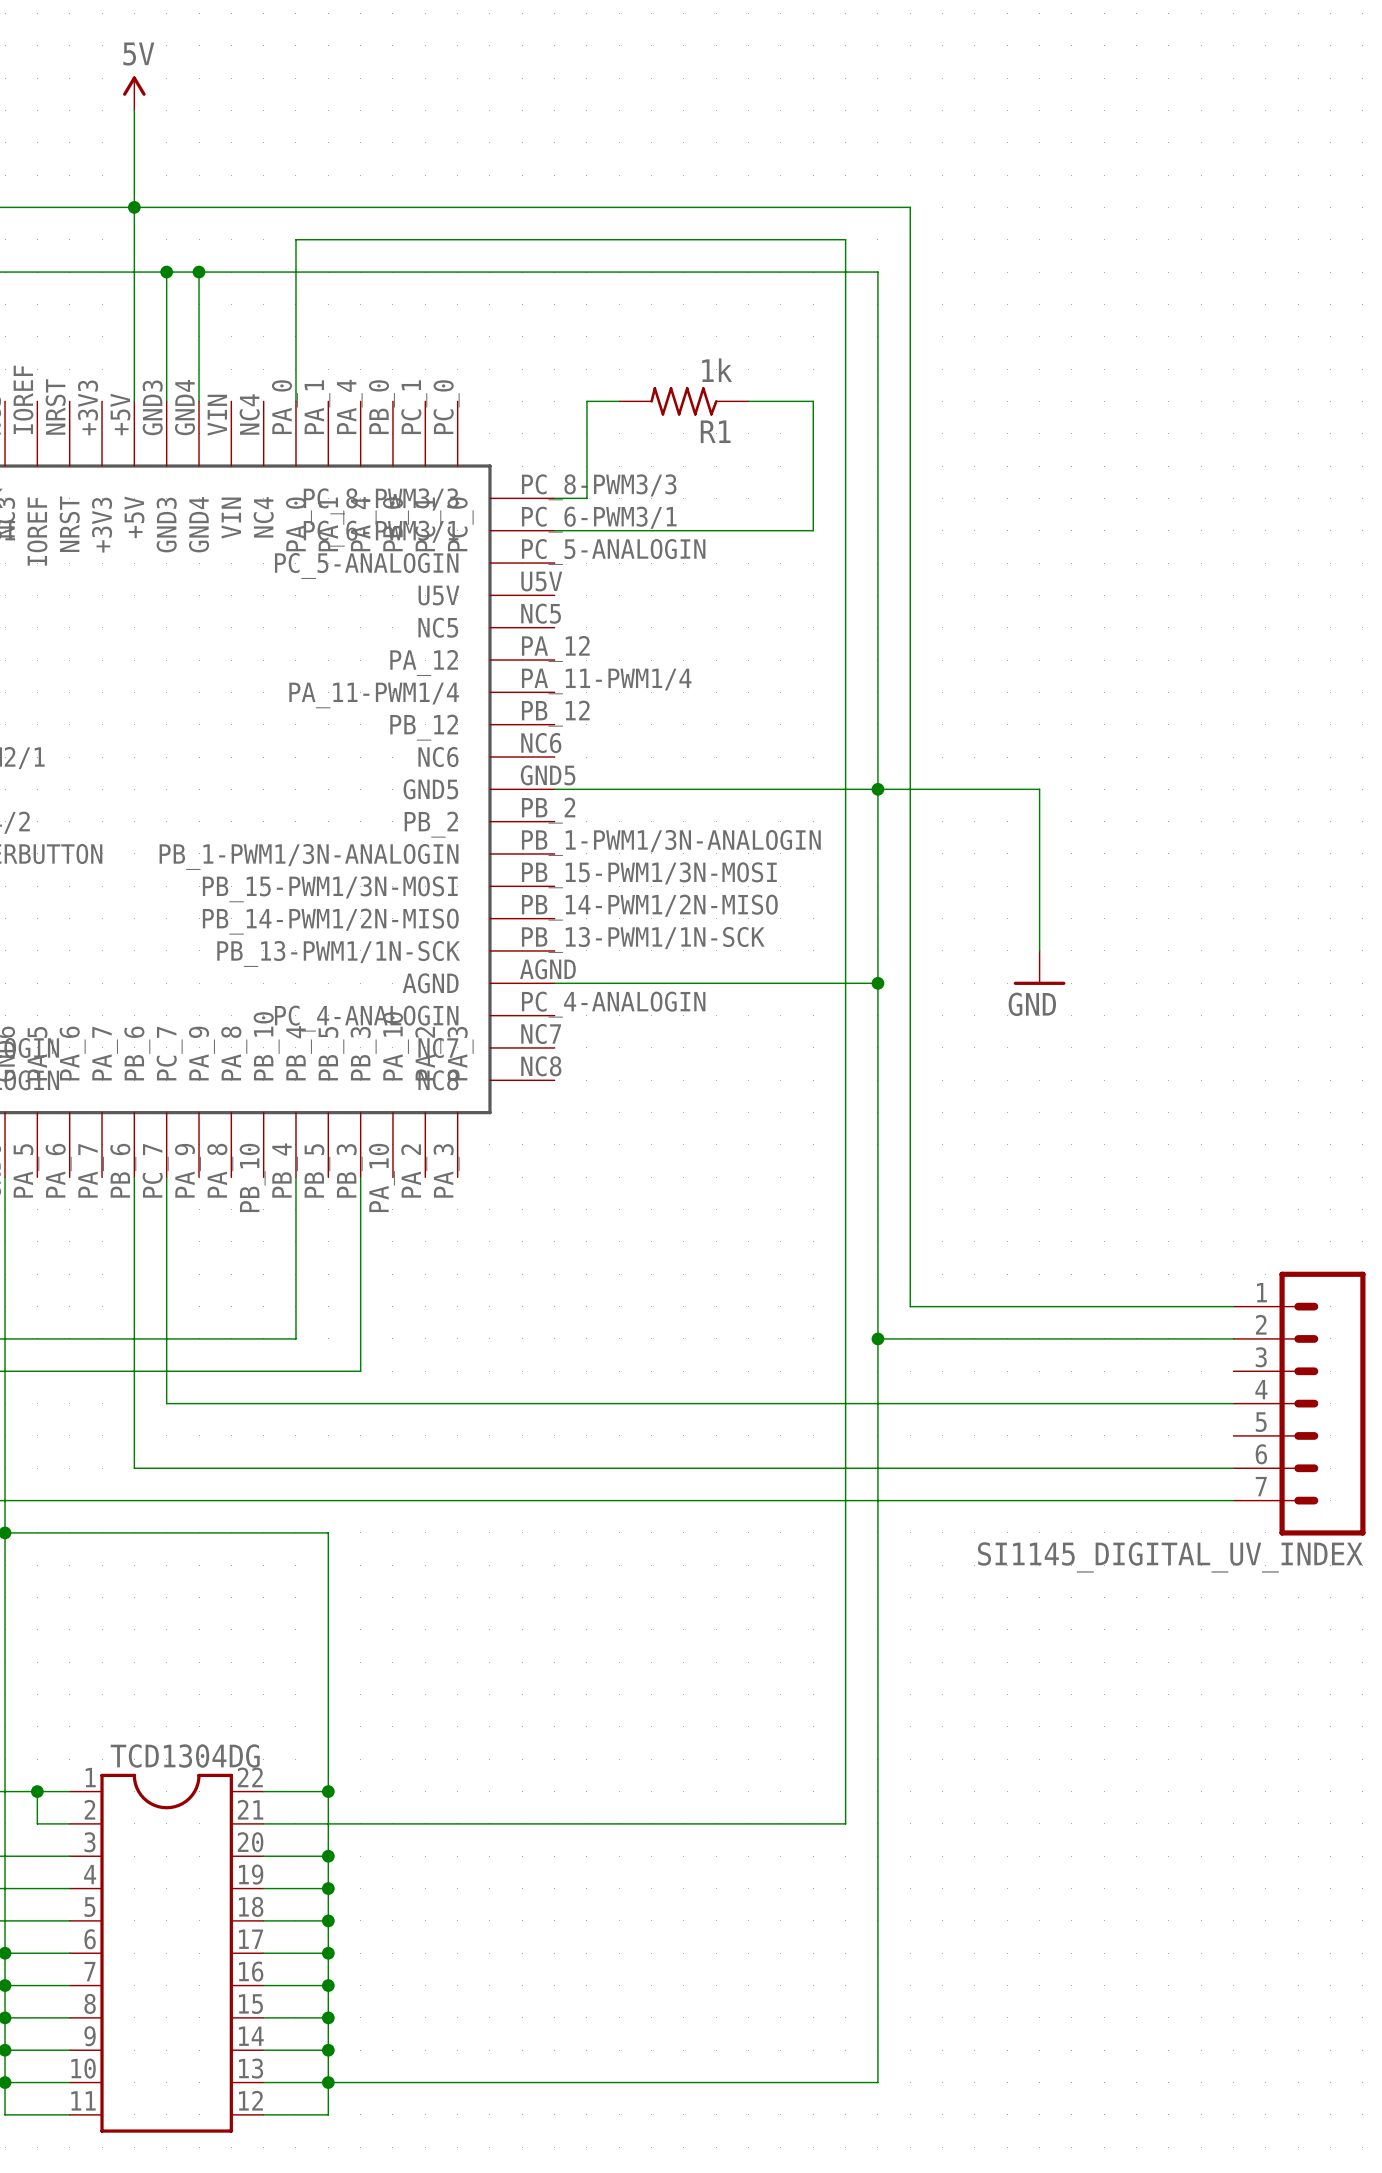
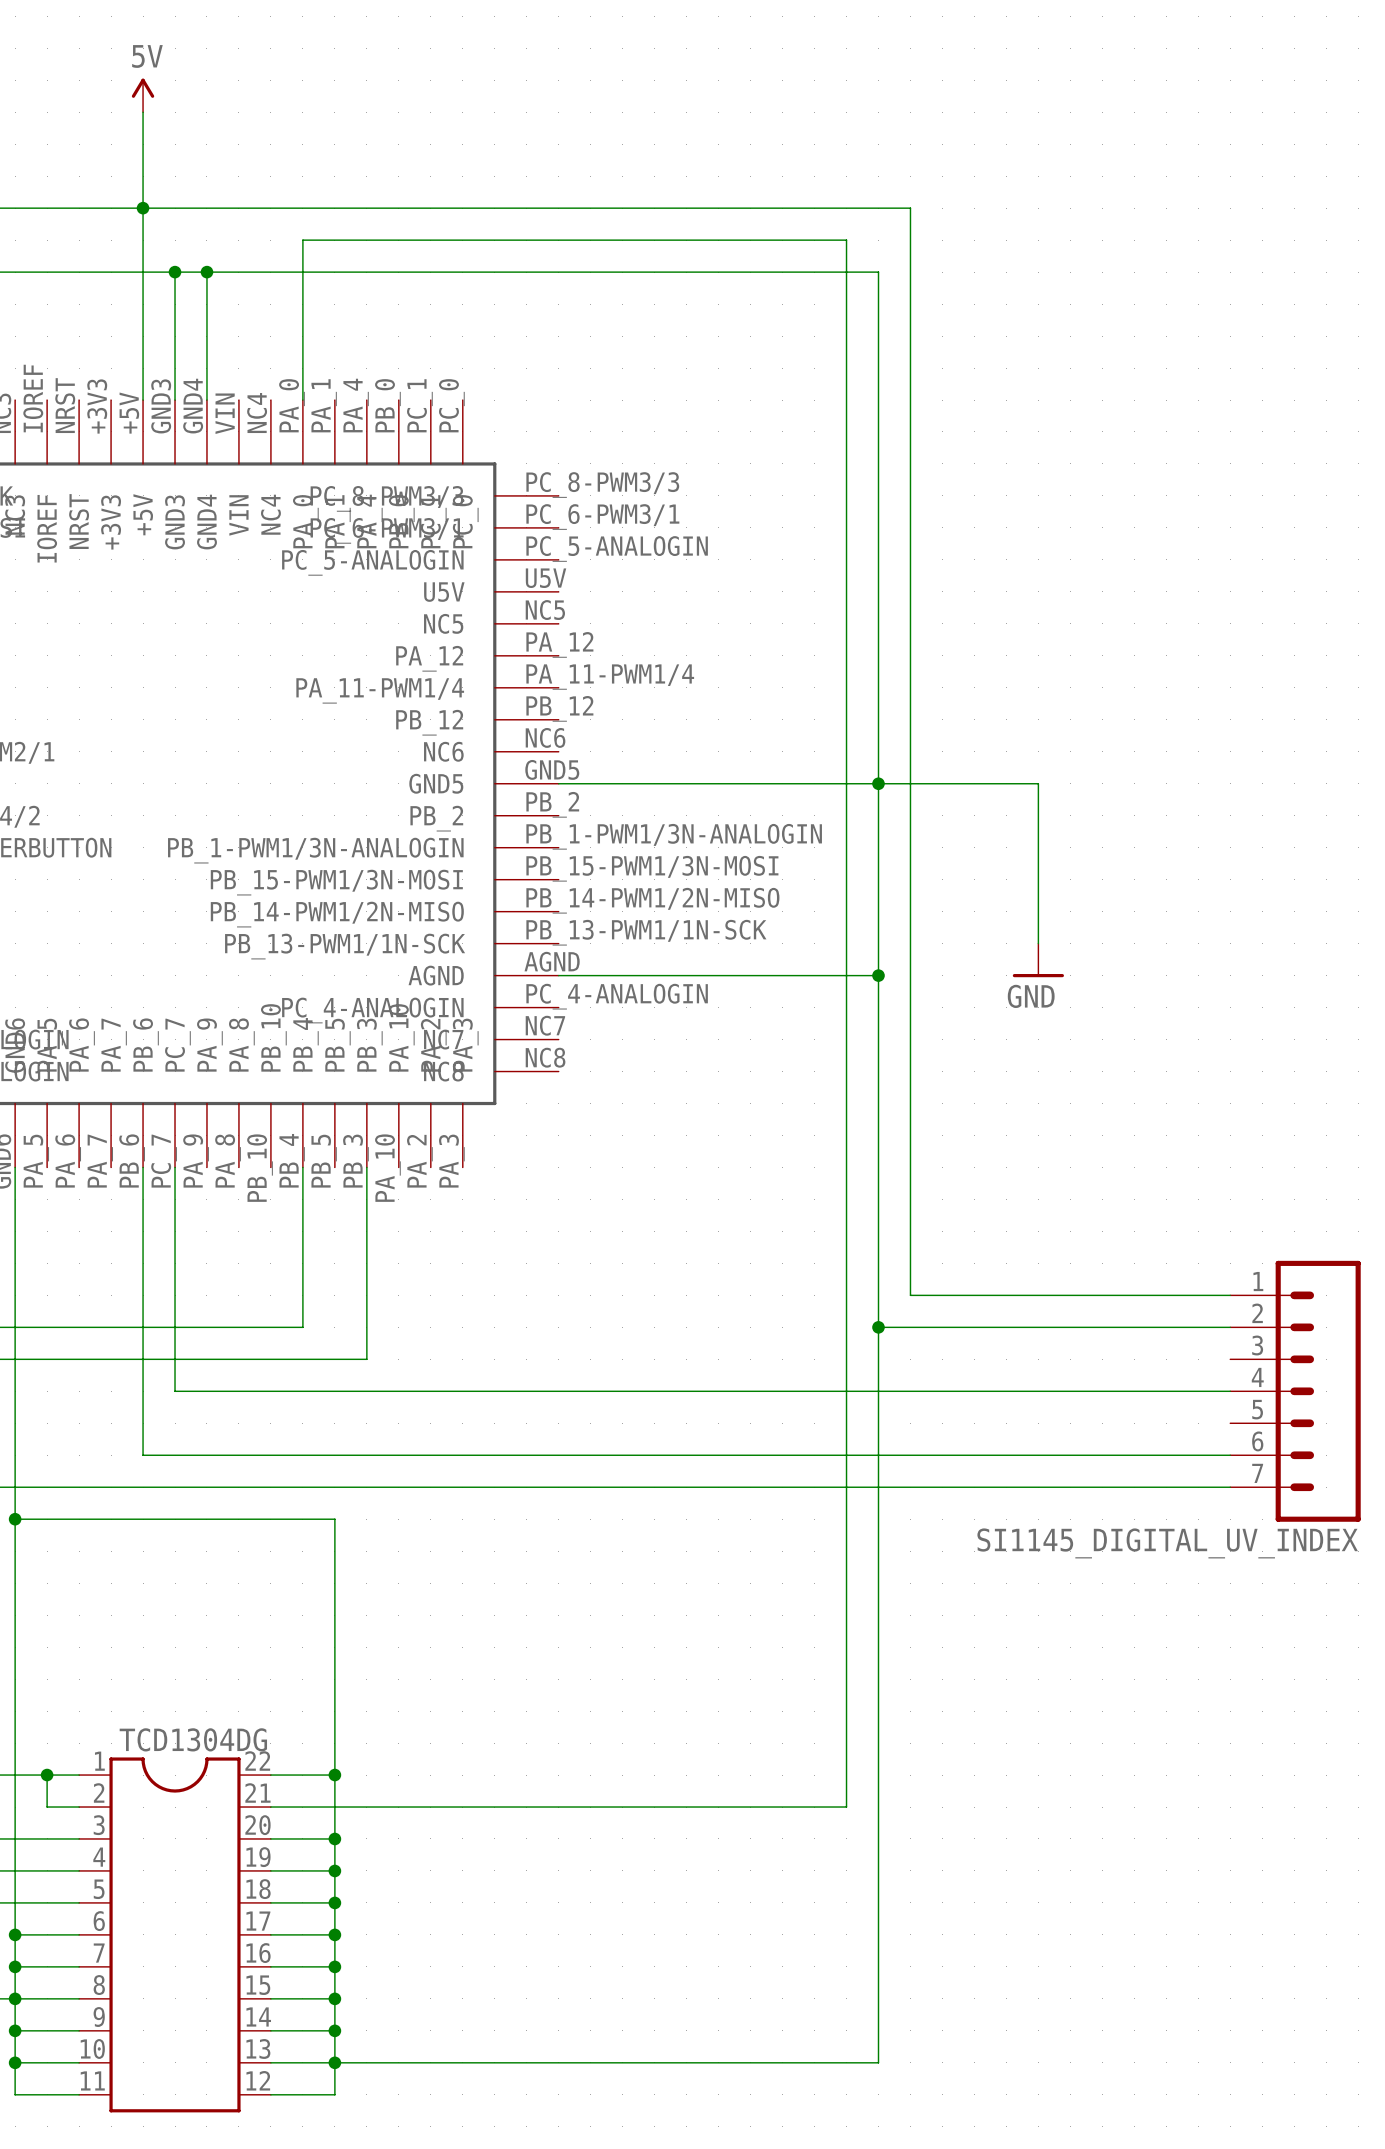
wire: (619, 401) (586, 401) (586, 498) (554, 498) -> none
R1: 1k (683, 401) -> none
wire: (748, 401) (813, 401) (813, 530) (554, 530) -> none

